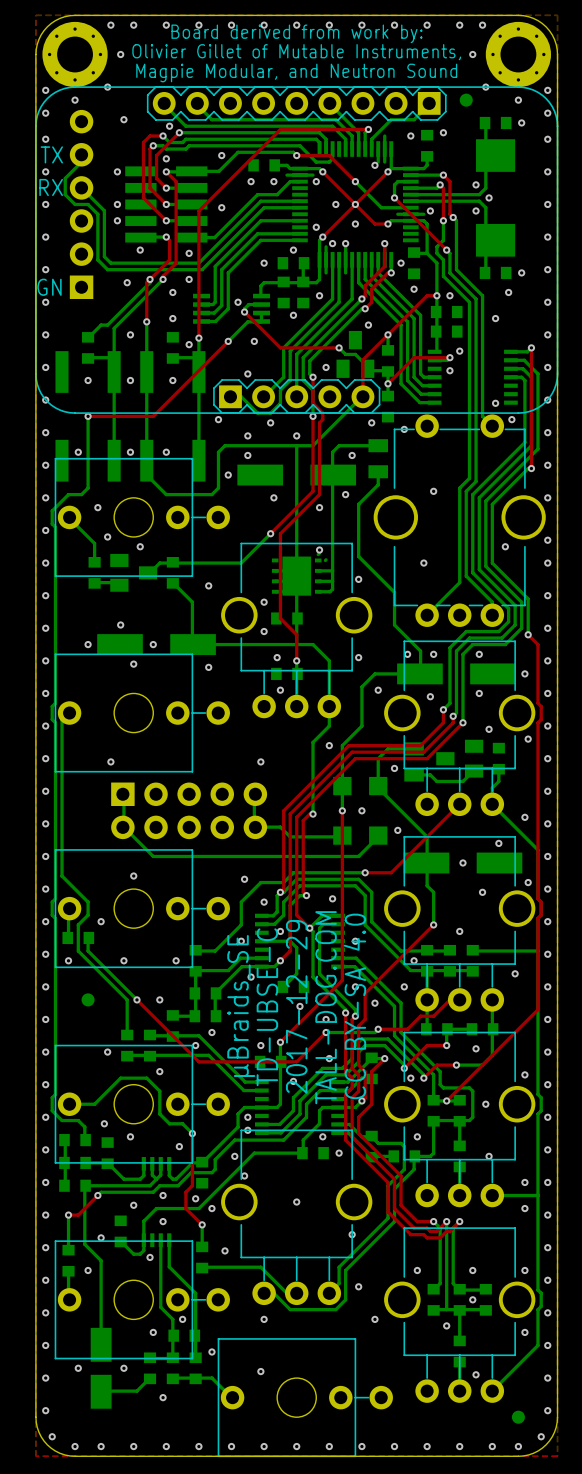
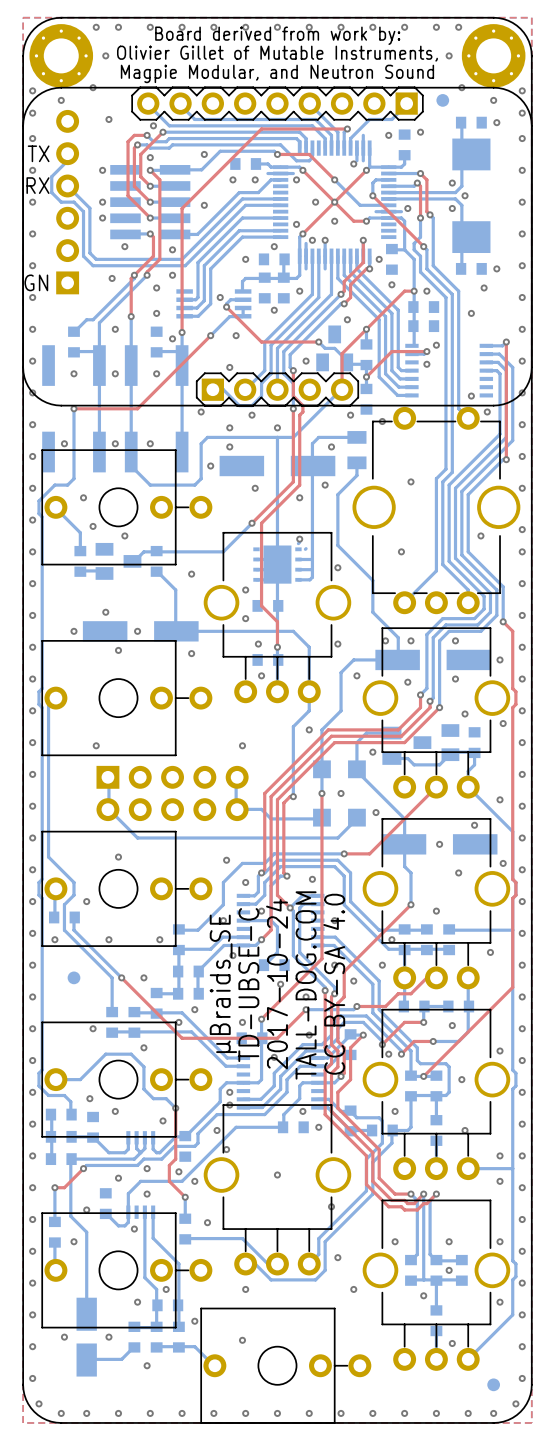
text: 2017-12-29 (296, 1006) -> 2017-10-24 (277, 984)

